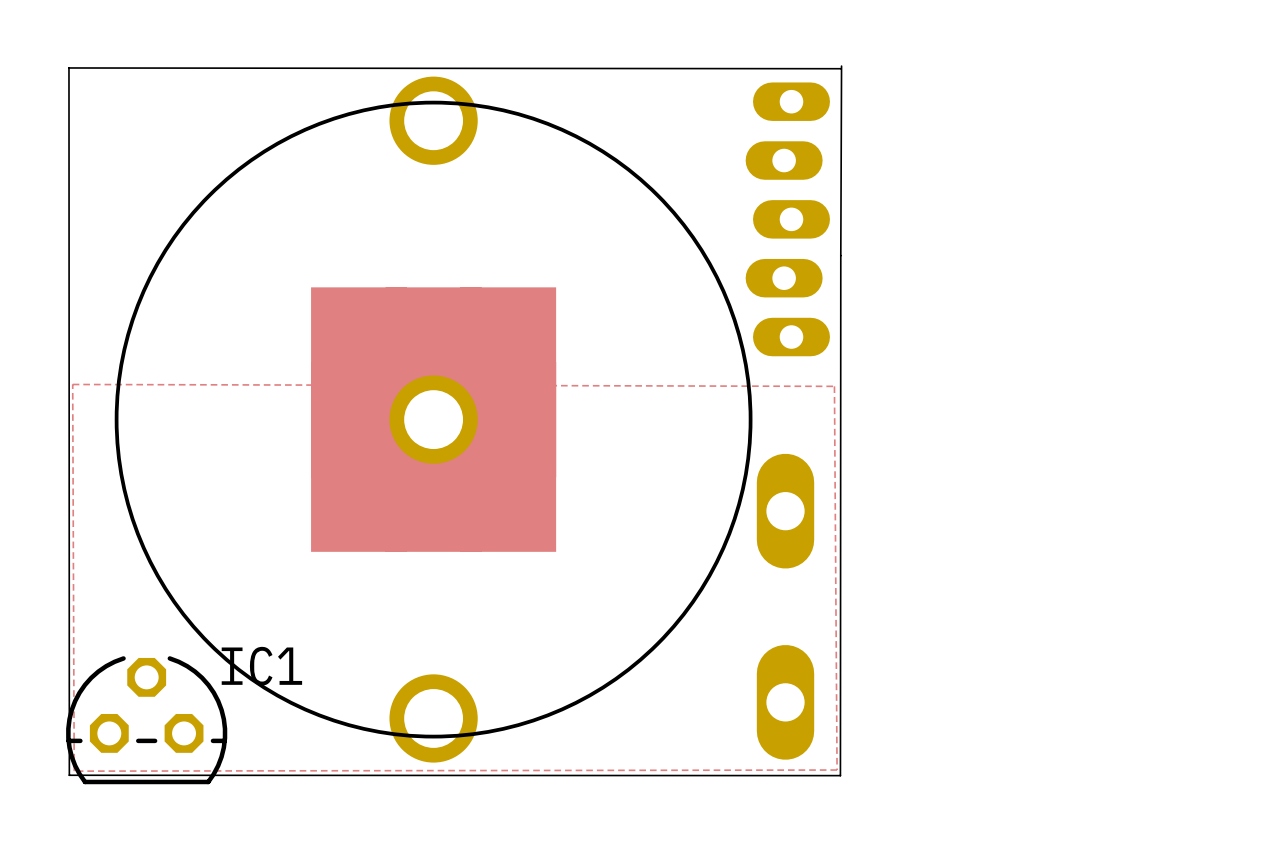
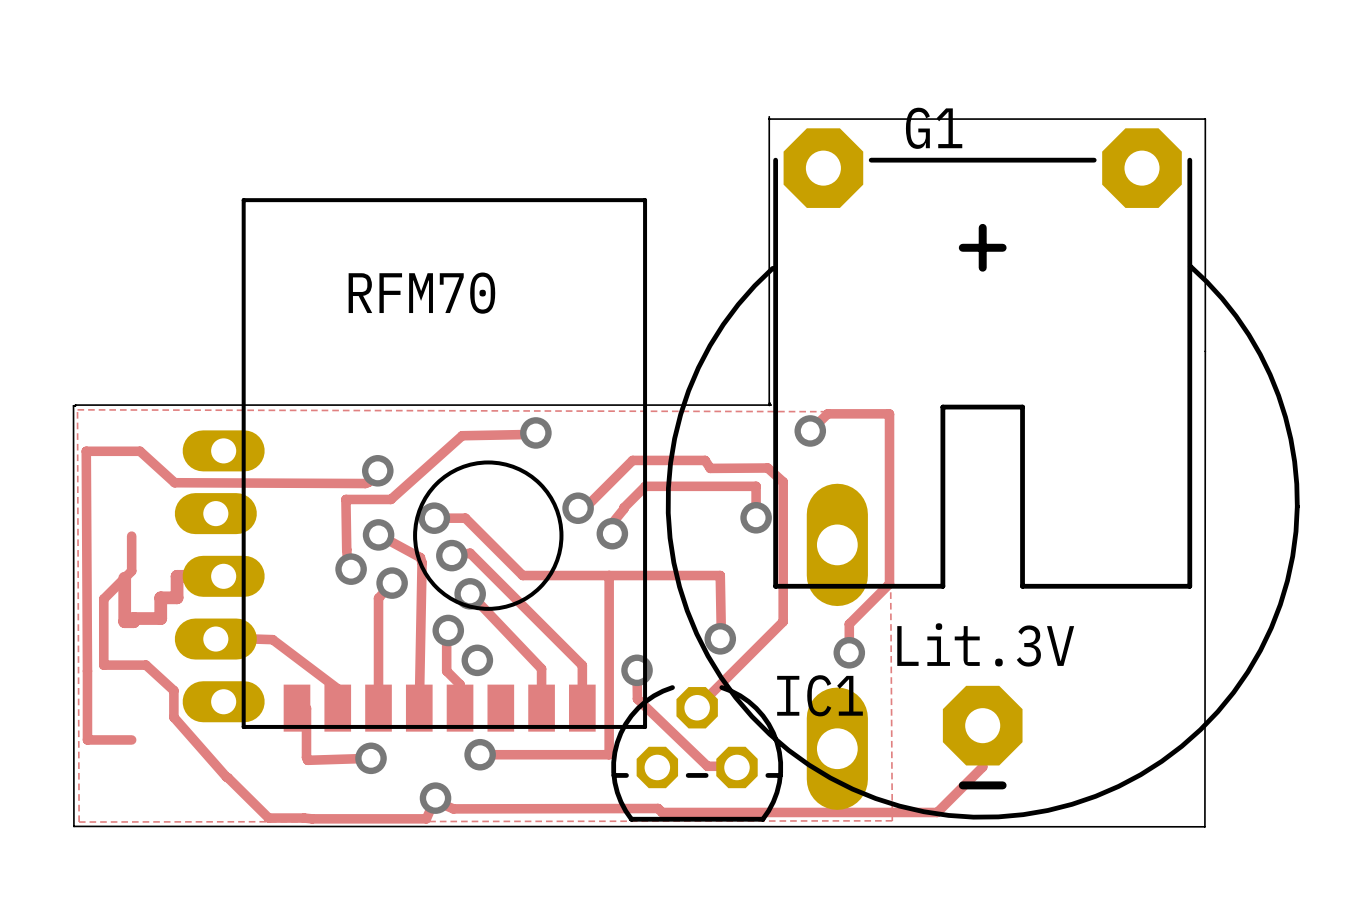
board edge: (841, 66) (840, 775) -> (768, 119) (1205, 119) (1204, 826) (895, 826)
board edge: (840, 68) (68, 67) (68, 380) -> (769, 116) (769, 405) (769, 403) (770, 405) (75, 405) (73, 405)
part footprint: [114, 76, 753, 763] -> [241, 198, 648, 732]
part position: (787, 219) -> (219, 576)
track: none -> (889, 413) (827, 413) (810, 430)
track: none -> (889, 414) (889, 583) (849, 624) (849, 652)
via: none -> (810, 430)
track: none -> (535, 432) (462, 435) (390, 499) (345, 499) (347, 560) (353, 570)
via: none -> (535, 432)
track: none -> (377, 470) (365, 483) (174, 482) (140, 451) (86, 451) (87, 739) (131, 739)
via: none -> (377, 470)
G1: none -> (982, 473)
track: none -> (578, 508) (587, 505) (632, 460) (705, 460) (710, 468) (767, 468) (783, 481) (783, 621) (697, 707)
via: none -> (578, 508)
track: none -> (756, 517) (756, 486) (645, 486) (623, 507) (606, 530) (612, 533)
via: none -> (756, 517)
track: none -> (434, 518) (465, 518) (522, 575) (720, 575) (721, 640) (720, 638)
via: none -> (434, 518)
via: none -> (612, 533)
track: none -> (378, 534) (420, 557) (422, 562) (419, 708)
via: none -> (378, 534)
track: none -> (131, 536) (131, 571) (103, 599) (103, 665) (146, 665) (173, 690) (173, 717) (226, 777) (268, 818) (426, 818) (435, 798) (433, 800) (453, 808) (658, 808) (662, 812) (937, 812) (982, 767) (982, 725)
track: none -> (451, 555) (470, 553) (582, 665) (582, 708)
via: none -> (451, 555)
via: none -> (351, 569)
track: none -> (609, 575) (609, 754) (480, 754)
track: none -> (223, 576) (177, 576) (177, 597) (160, 597) (160, 618) (133, 618) (133, 621) (124, 621) (124, 578)
track: none -> (392, 583) (378, 598) (378, 708)
via: none -> (392, 583)
track: none -> (470, 593) (541, 668) (541, 708)
via: none -> (470, 593)
track: none -> (448, 630) (446, 626) (446, 671) (460, 684) (460, 708)
via: none -> (448, 630)
track: none -> (215, 639) (272, 639) (337, 688) (337, 708)
via: none -> (720, 638)
via: none -> (849, 652)
via: none -> (477, 660)
track: none -> (637, 670) (637, 698) (707, 766) (736, 767)
via: none -> (637, 670)
track: none -> (296, 708) (306, 708) (307, 760) (371, 758)
via: none -> (480, 754)
via: none -> (371, 758)
IC1 position: (146, 720) -> (697, 753)
via: none -> (435, 798)

